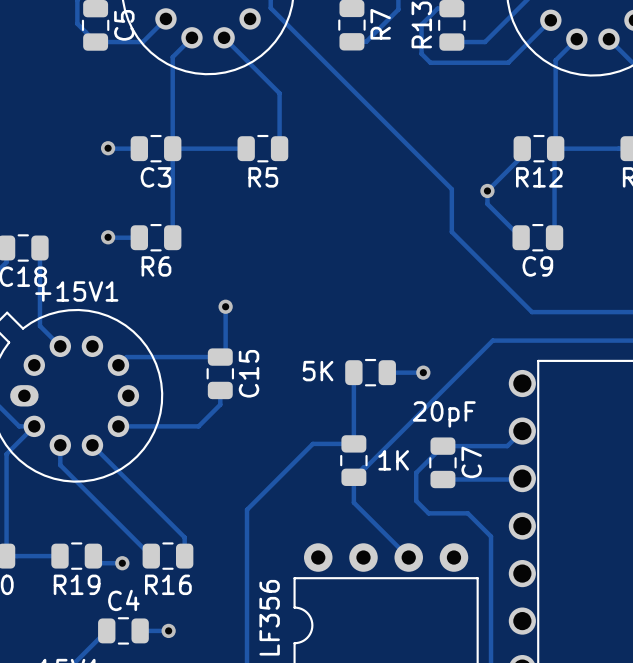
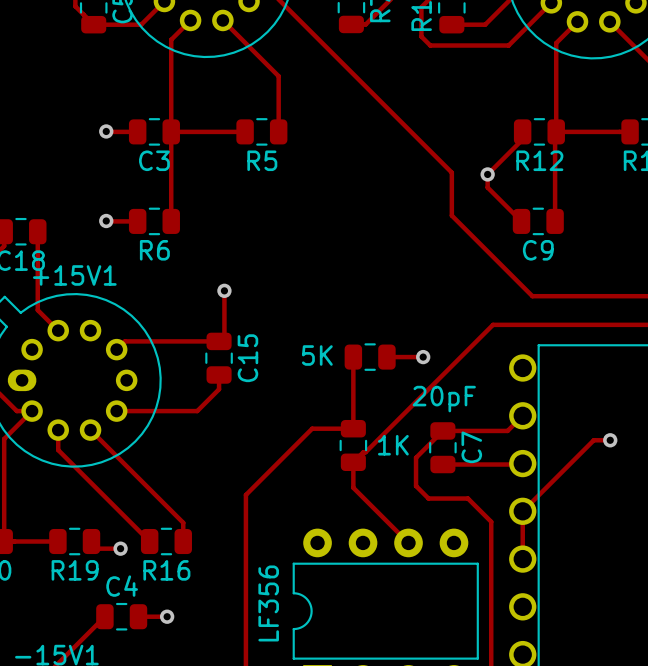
track: none -> (610, 440) (593, 440) (522, 511) (522, 559)
via: none -> (610, 440)

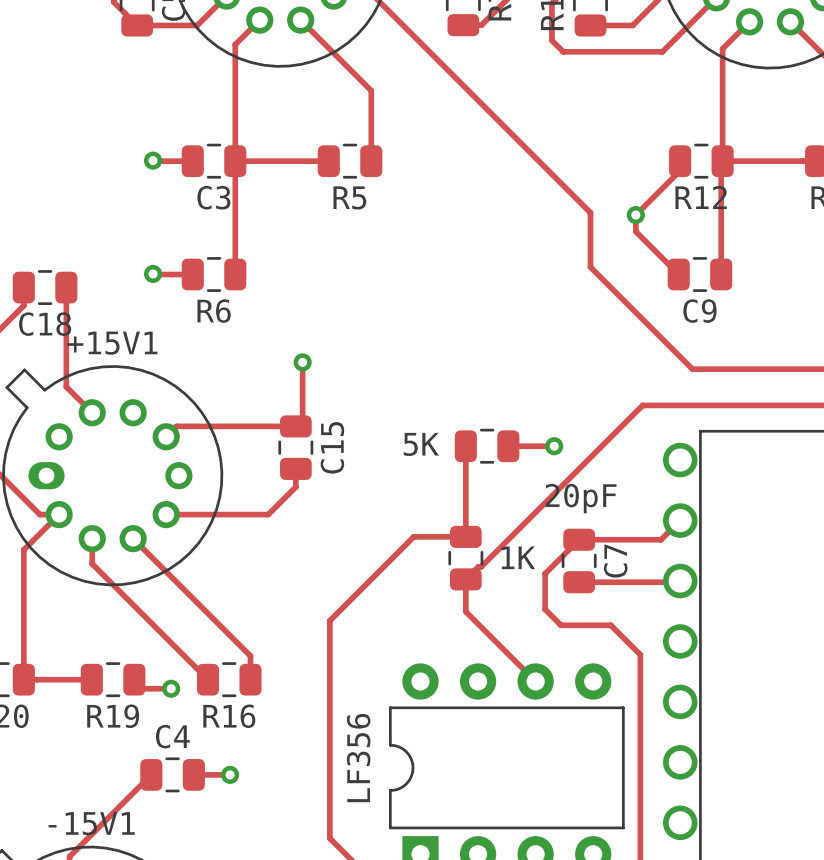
track: (610, 440) (593, 440) (522, 511) (522, 559) -> none
via: (610, 440) -> none

